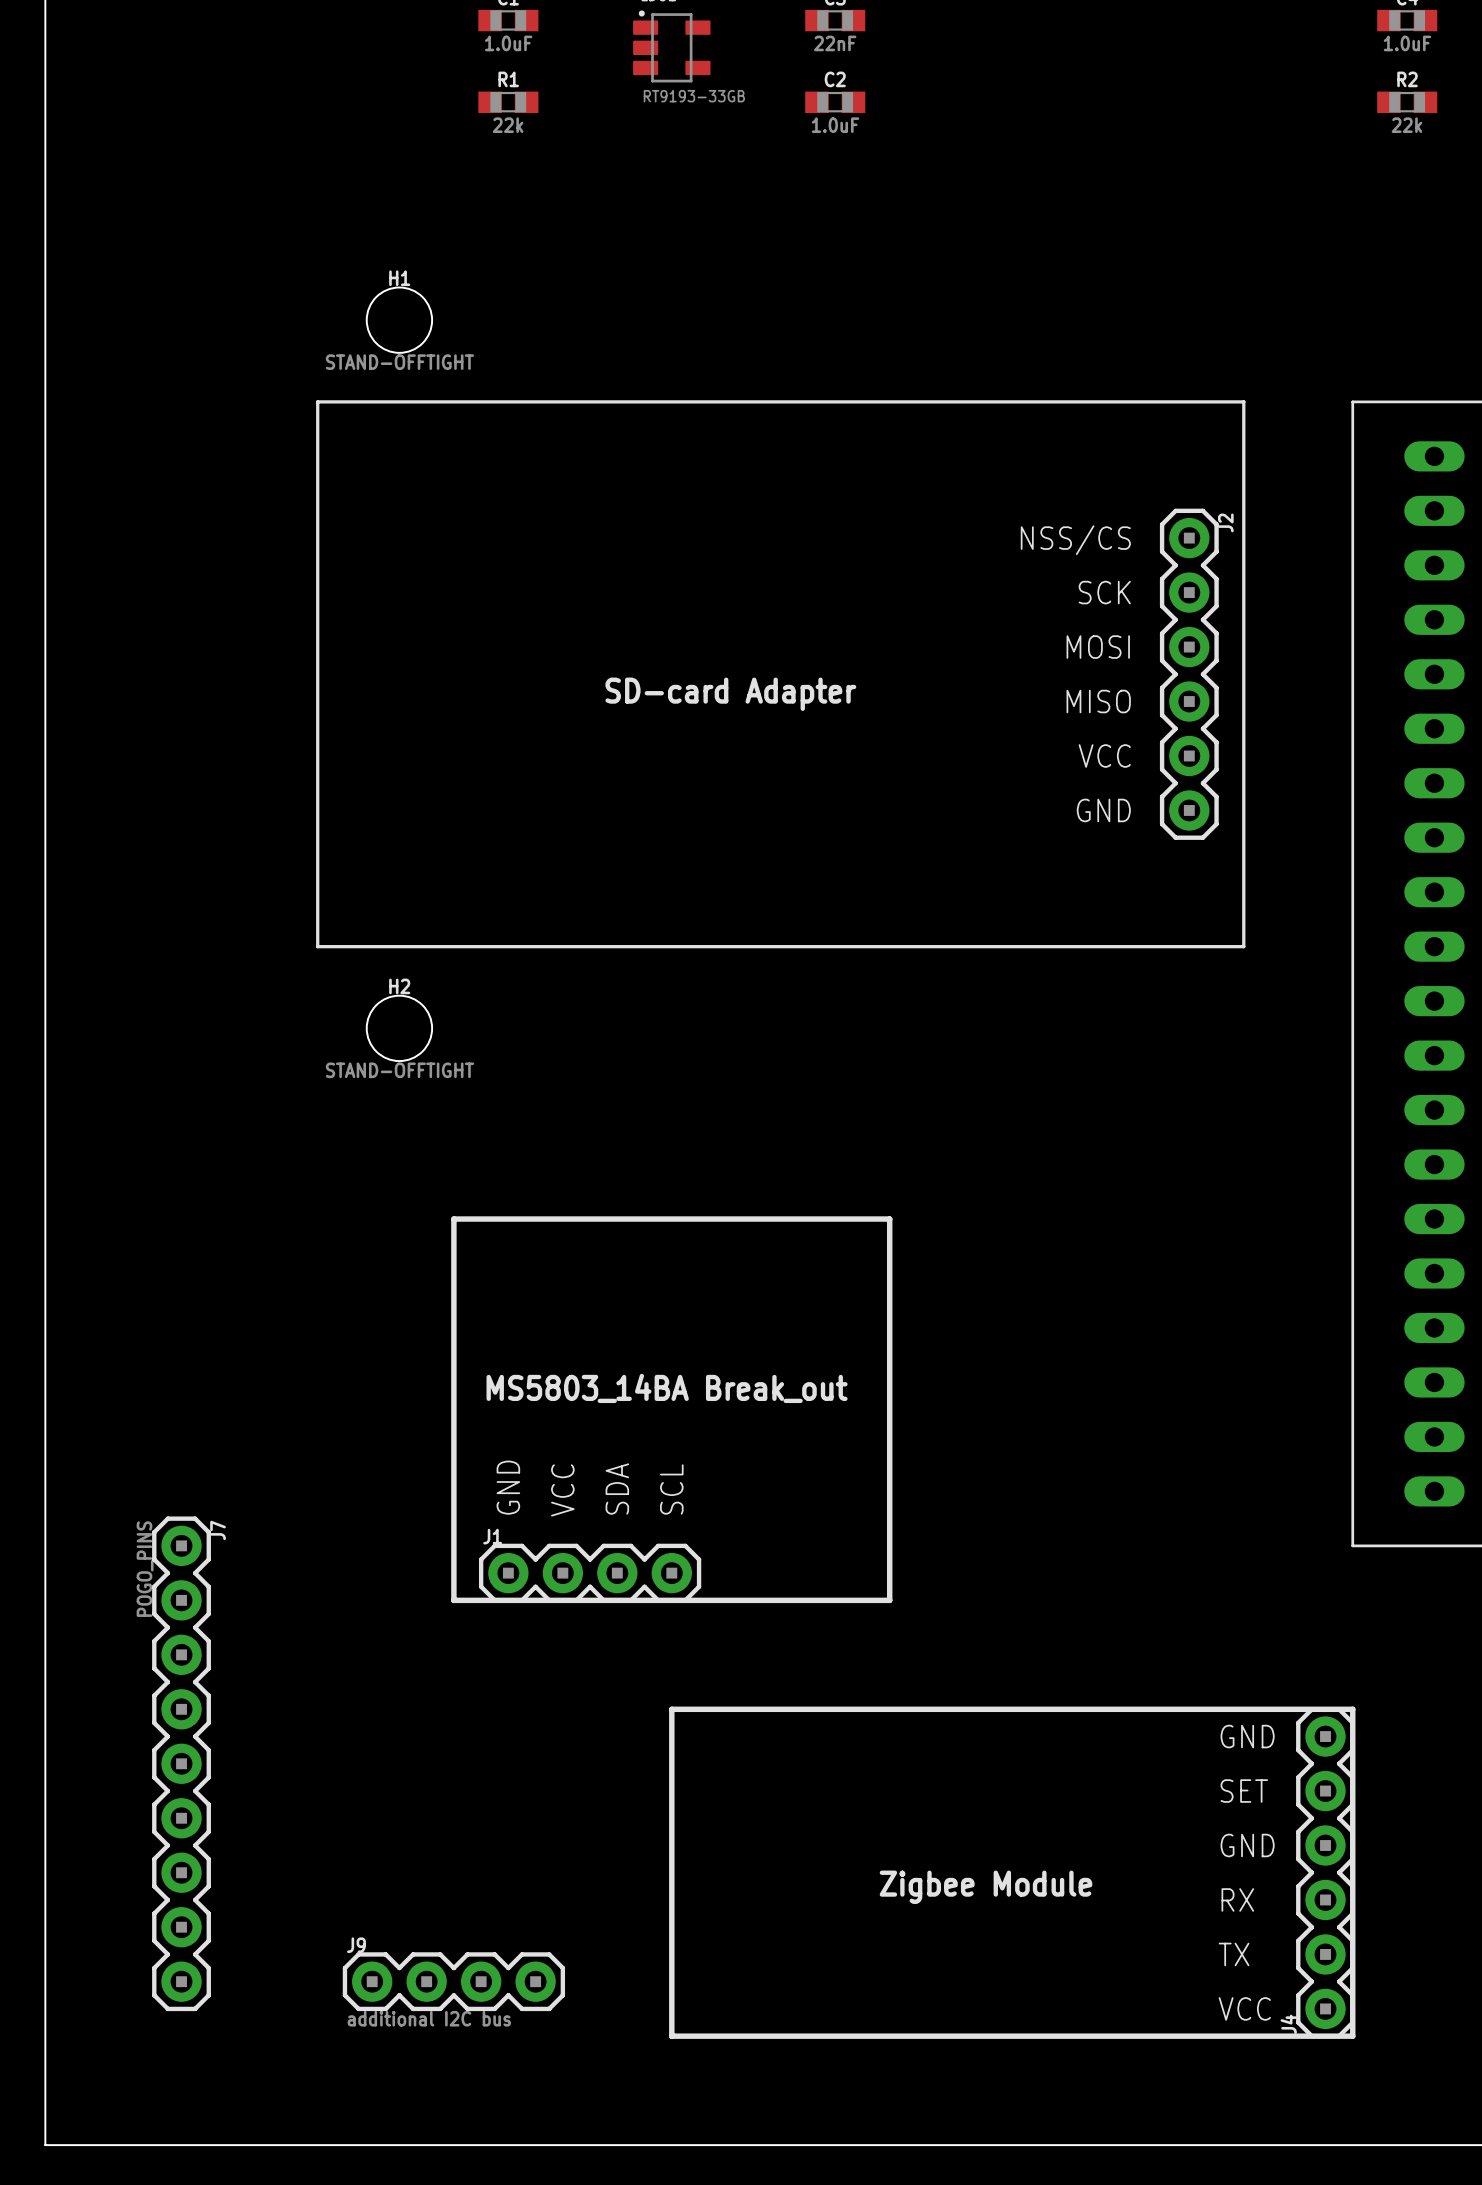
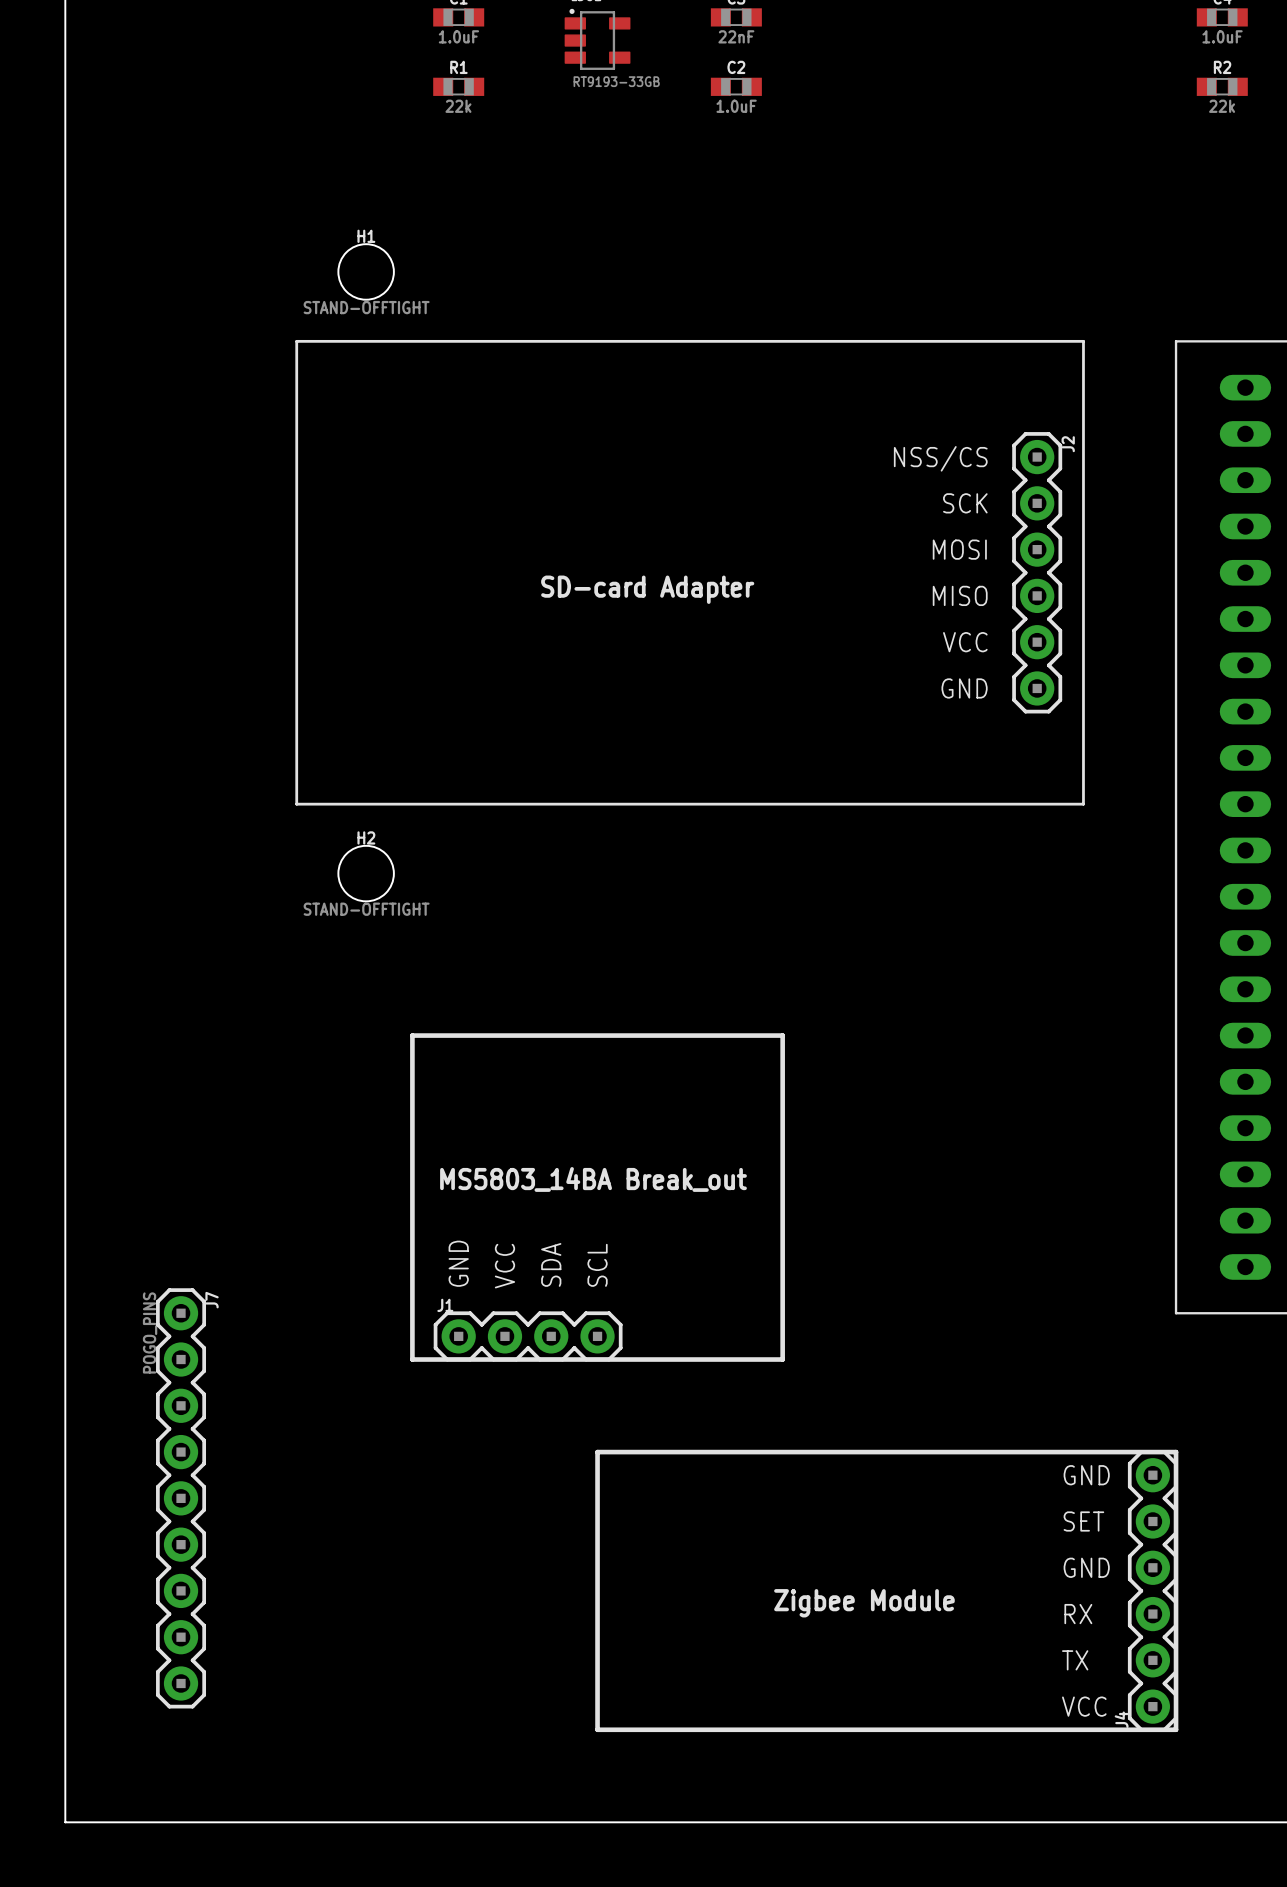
J9: additional I2C bus (453, 1981) -> none

